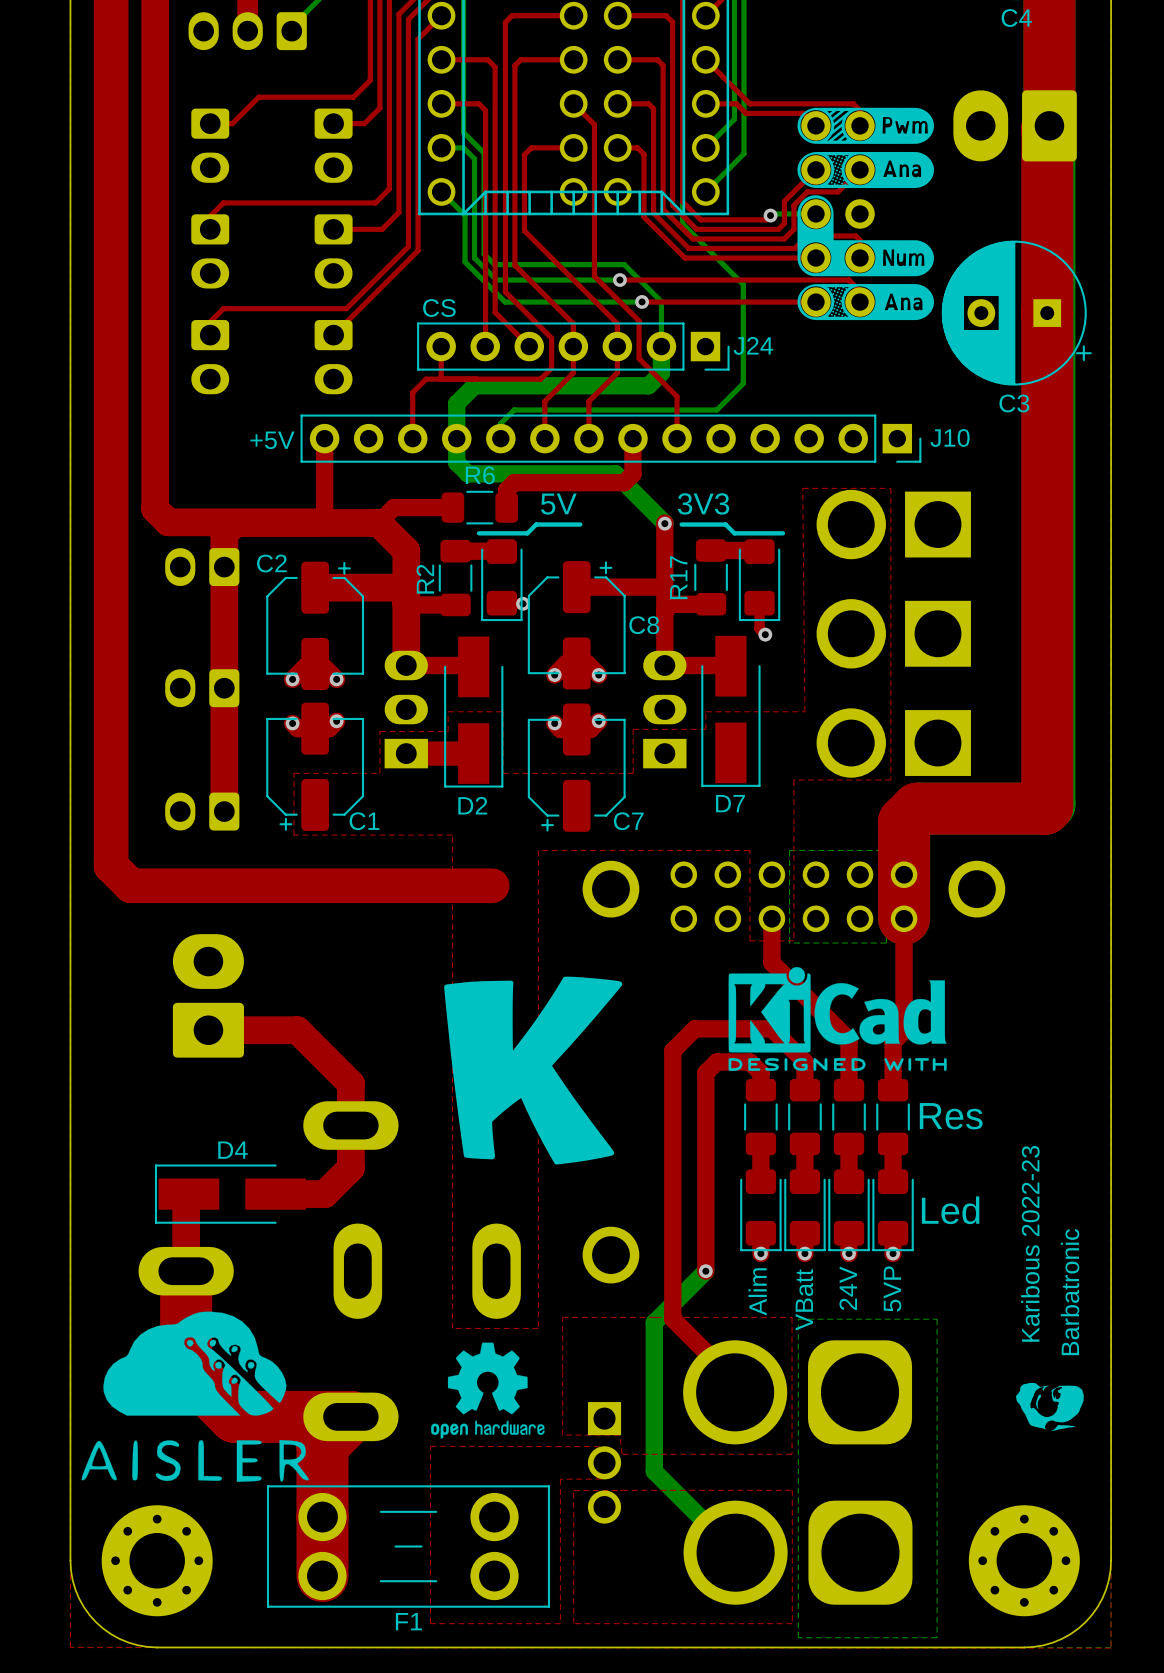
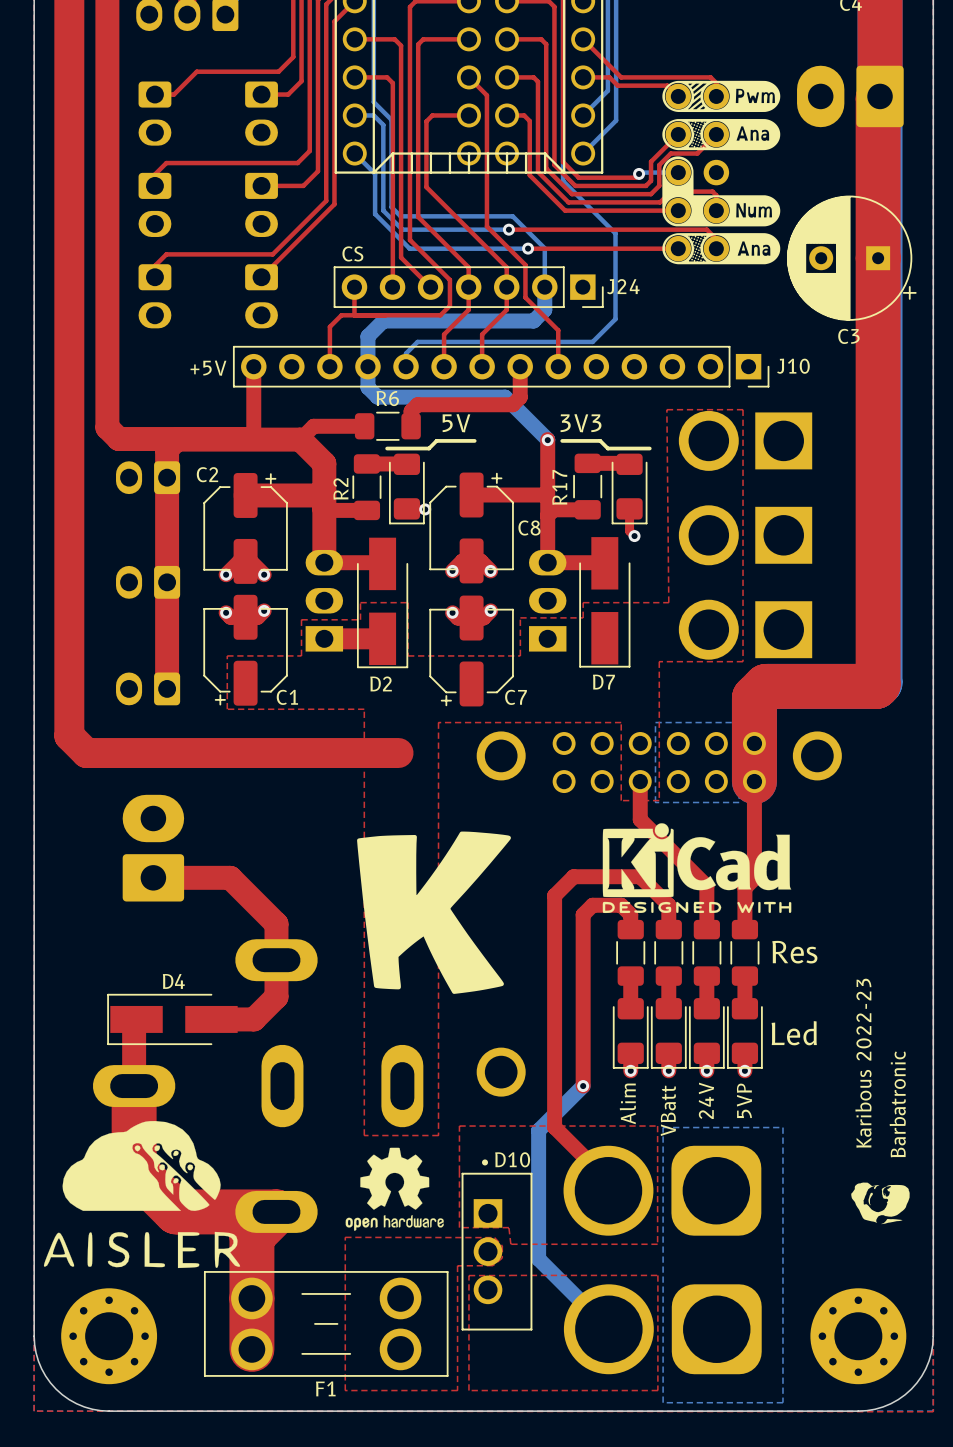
D10 side: bottom (604, 1462) -> top (496, 1244)

